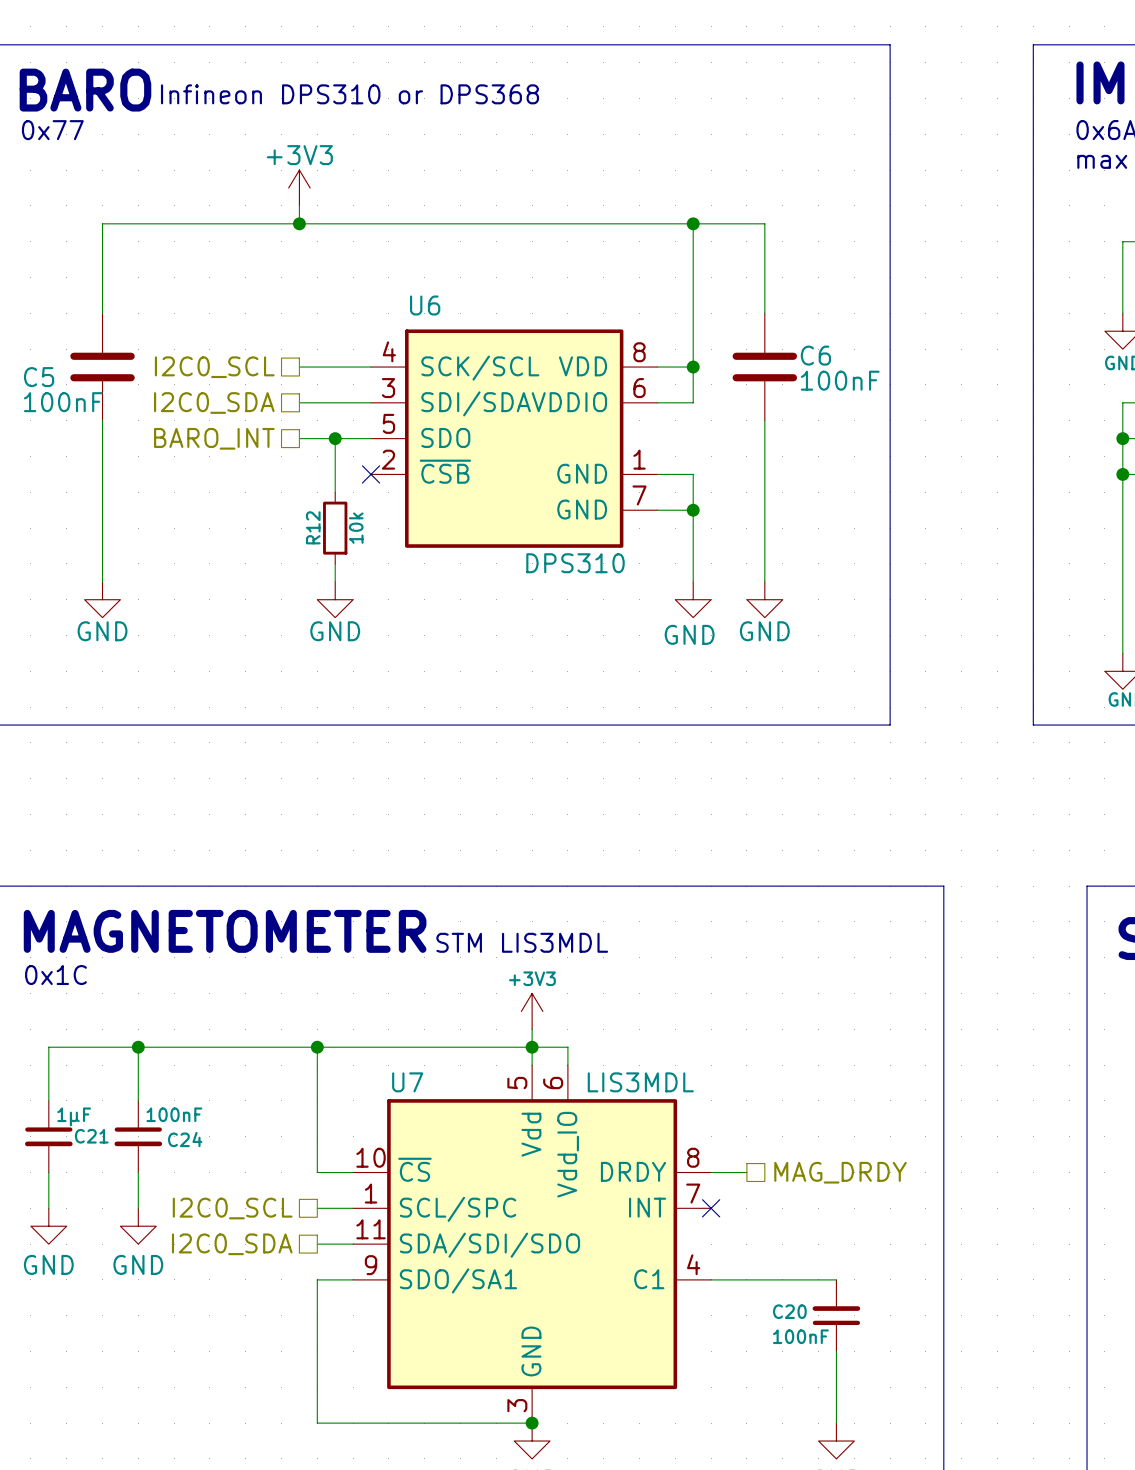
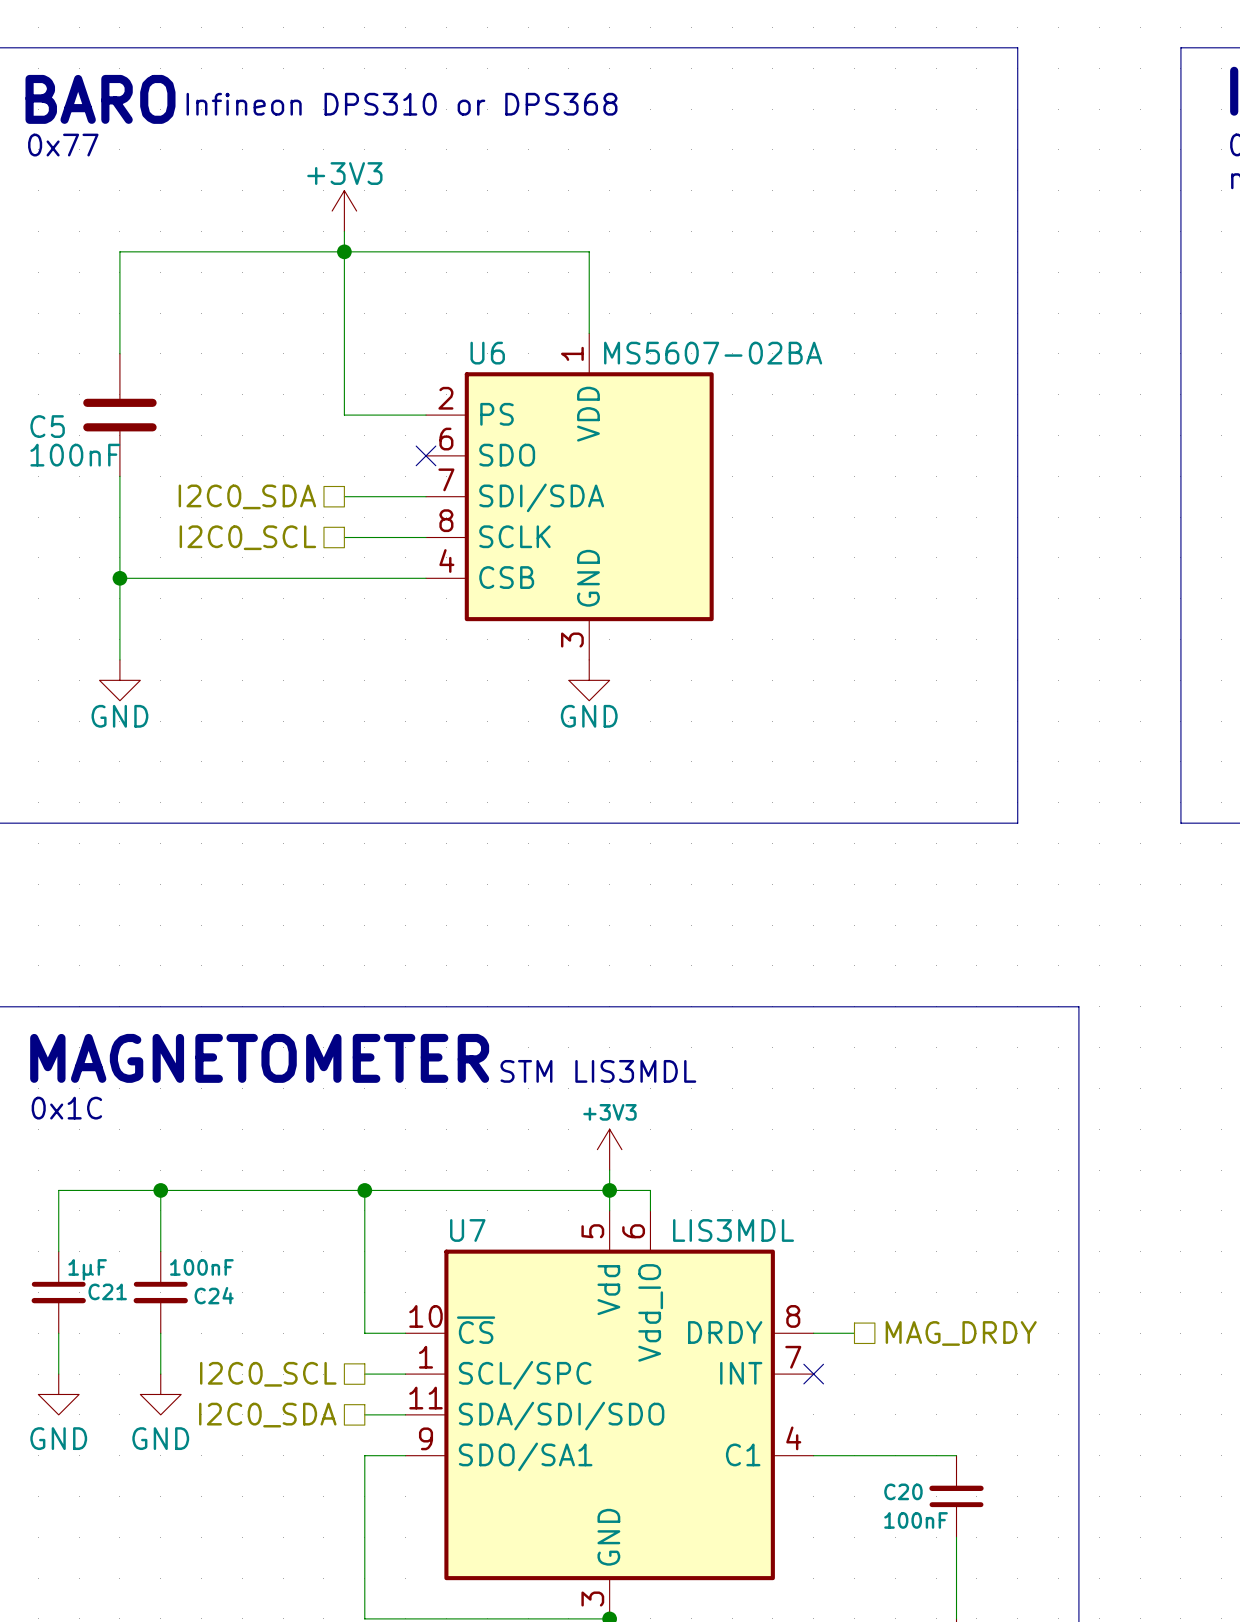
wire: none -> (344, 251) (344, 415)
wire: (514, 223) (764, 223) (764, 313) -> (589, 251) (589, 333)
wire: (693, 223) (693, 402) (657, 402) -> none
junction: (693, 223) -> none
U6 symbol: [371, 329, 658, 548] -> [426, 333, 714, 660]
hierarchical label position: I2C0_SCL (214, 367) -> I2C0_SCL (247, 537)
wire: (657, 367) (693, 367) -> none
junction: (693, 367) -> none
C6: 100nF (764, 367) -> none
wire: (299, 402) (371, 402) -> (344, 537) (426, 537)
hierarchical label: I2C0_SDA (214, 403) -> none
wire: (764, 420) (764, 581) -> none
hierarchical label: BARO_INT (214, 438) -> I2C0_SDA (247, 496)
wire: (335, 438) (335, 492) -> none
junction: (335, 438) -> none
no-connect mark position: (371, 474) -> (426, 455)
wire: (657, 474) (693, 474) (693, 581) -> none
wire: none -> (119, 578) (426, 578)
junction: none -> (119, 578)
wire: (657, 510) (693, 510) -> none
junction: (693, 510) -> none
R12: 10k (335, 528) -> none
wire: (335, 563) (335, 581) -> none
U6 value: DPS310 (575, 563) -> MS5607-02BA (713, 353)
power symbol: GND (335, 599) -> none
power symbol: none -> GND (589, 680)
power symbol: GND (693, 599) -> none
power symbol: GND (764, 599) -> none

